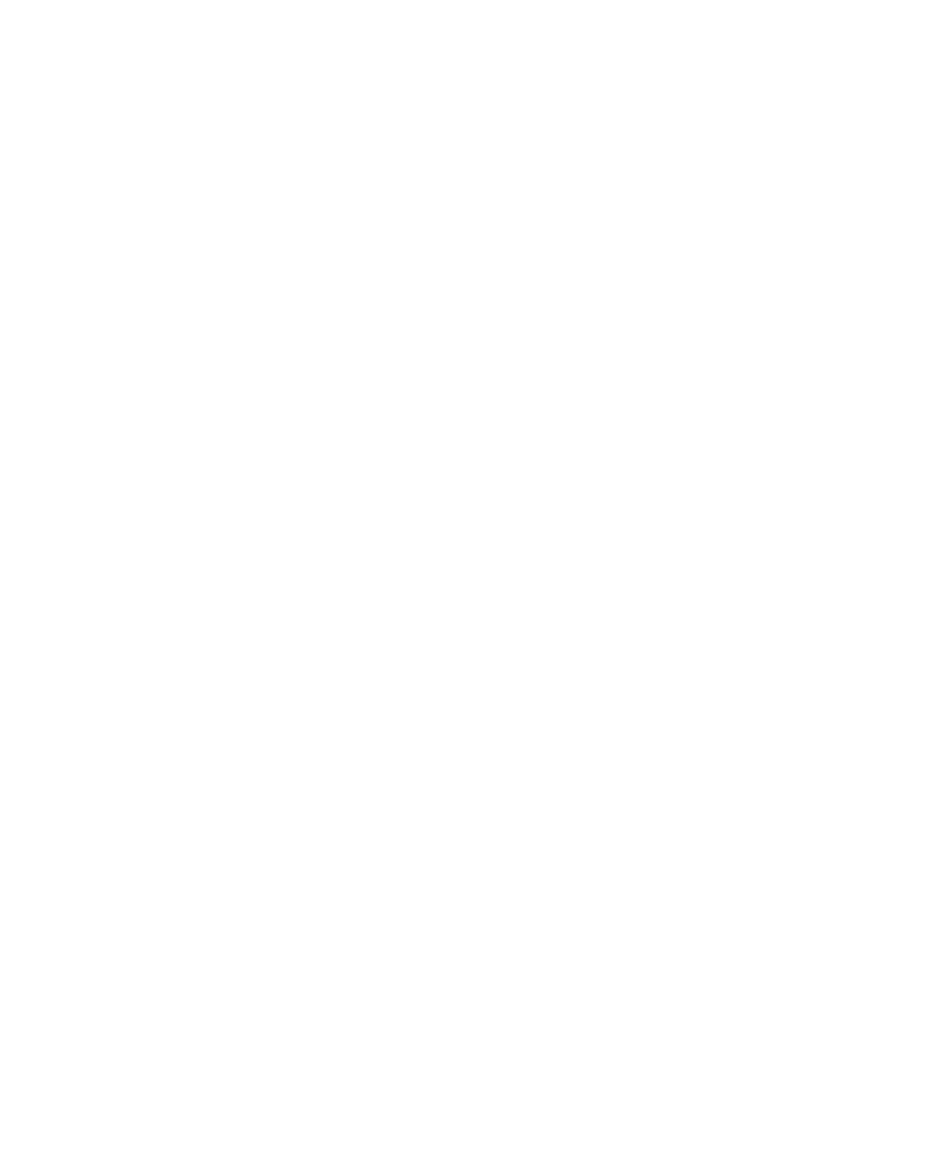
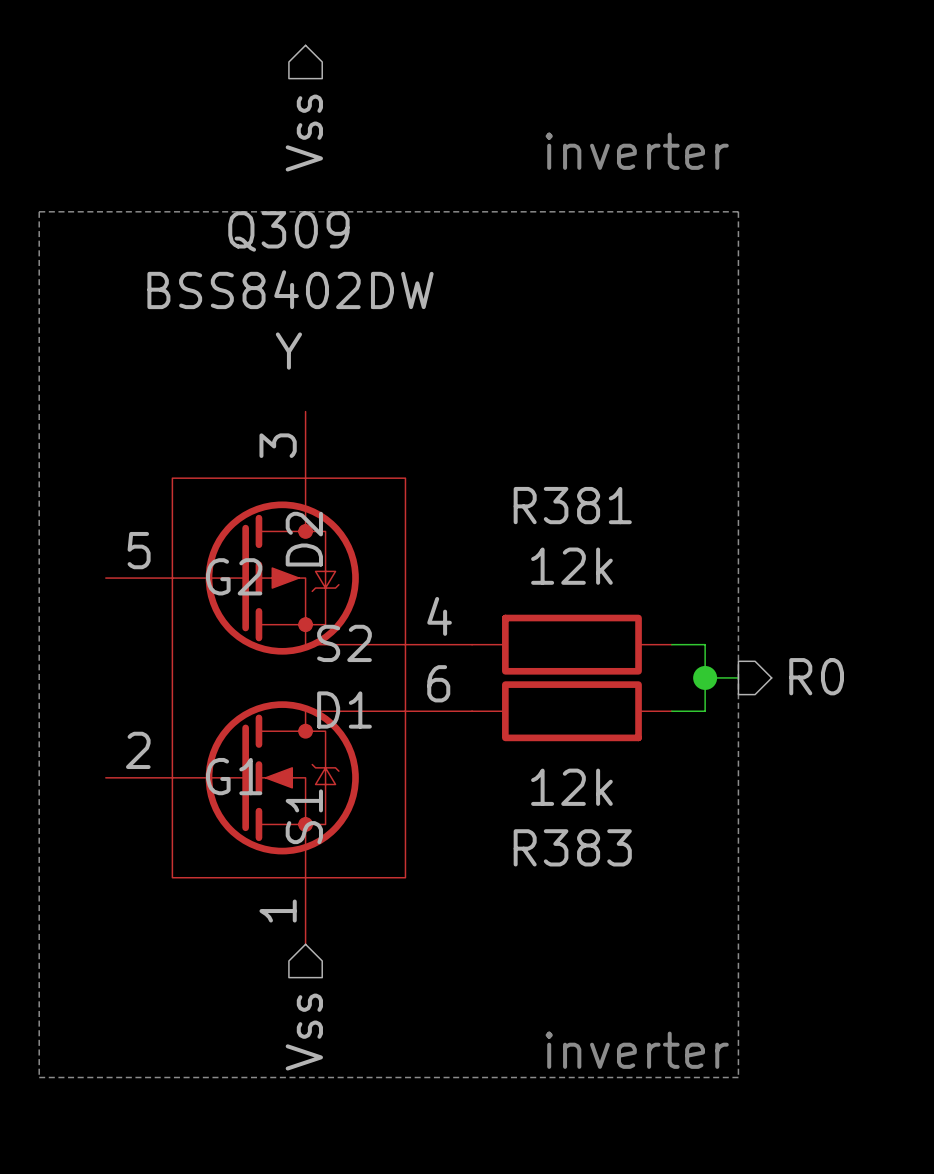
hierarchical label: none -> Vss (304, 133)
text: none -> inverter (637, 151)
line: none -> (39, 211) (39, 1077) (738, 1077) (738, 211) (39, 211)
R381: none -> 12k (571, 644)
wire: none -> (671, 644) (705, 644) (705, 711) (671, 711)
hierarchical label: none -> R0 (816, 676)
Q309: none -> BSS8402DW (288, 677)
wire: none -> (705, 677) (738, 677)
junction: none -> (705, 677)
R383: none -> 12k (571, 711)
hierarchical label: none -> Vss (304, 1032)
text: none -> inverter (637, 1050)

